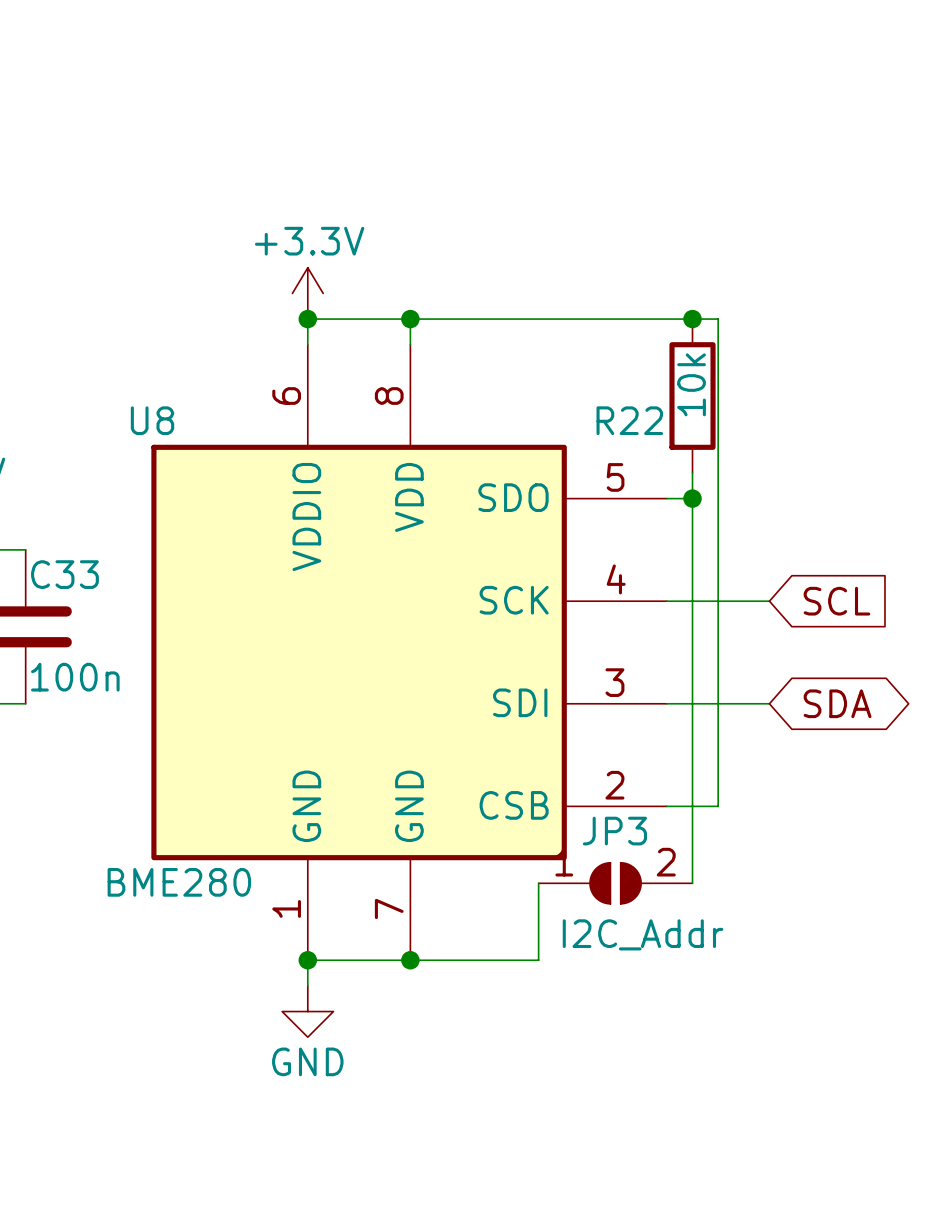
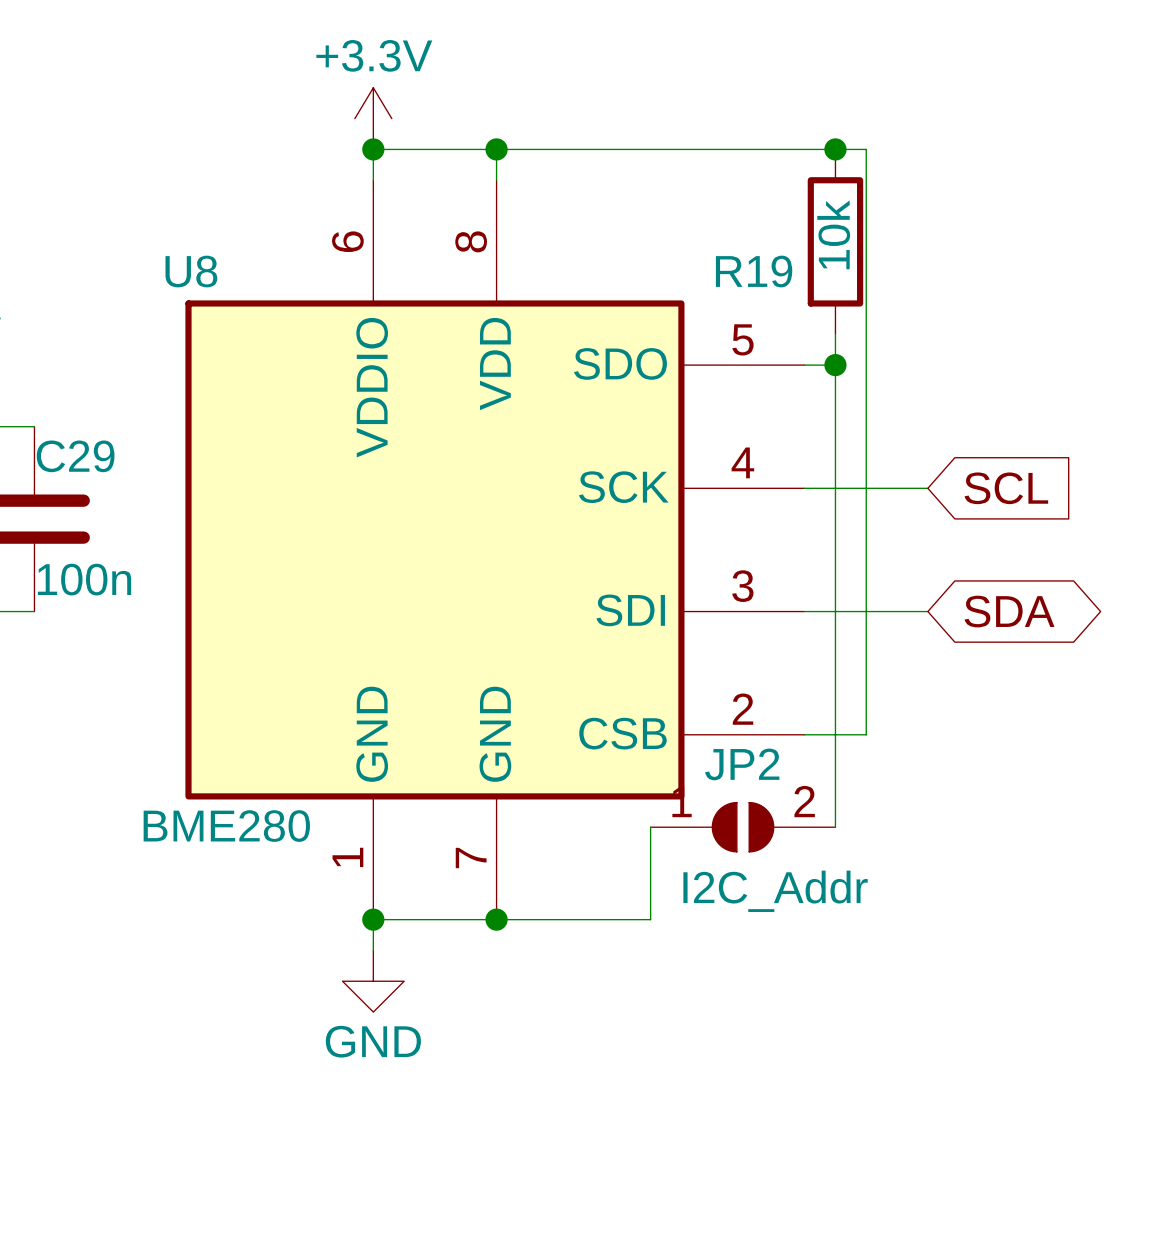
R22 name: R22 (629, 420) -> R19 (754, 271)
C33 name: C33 (64, 574) -> C29 (75, 456)
JP3 name: JP3 (614, 831) -> JP2 (742, 764)

